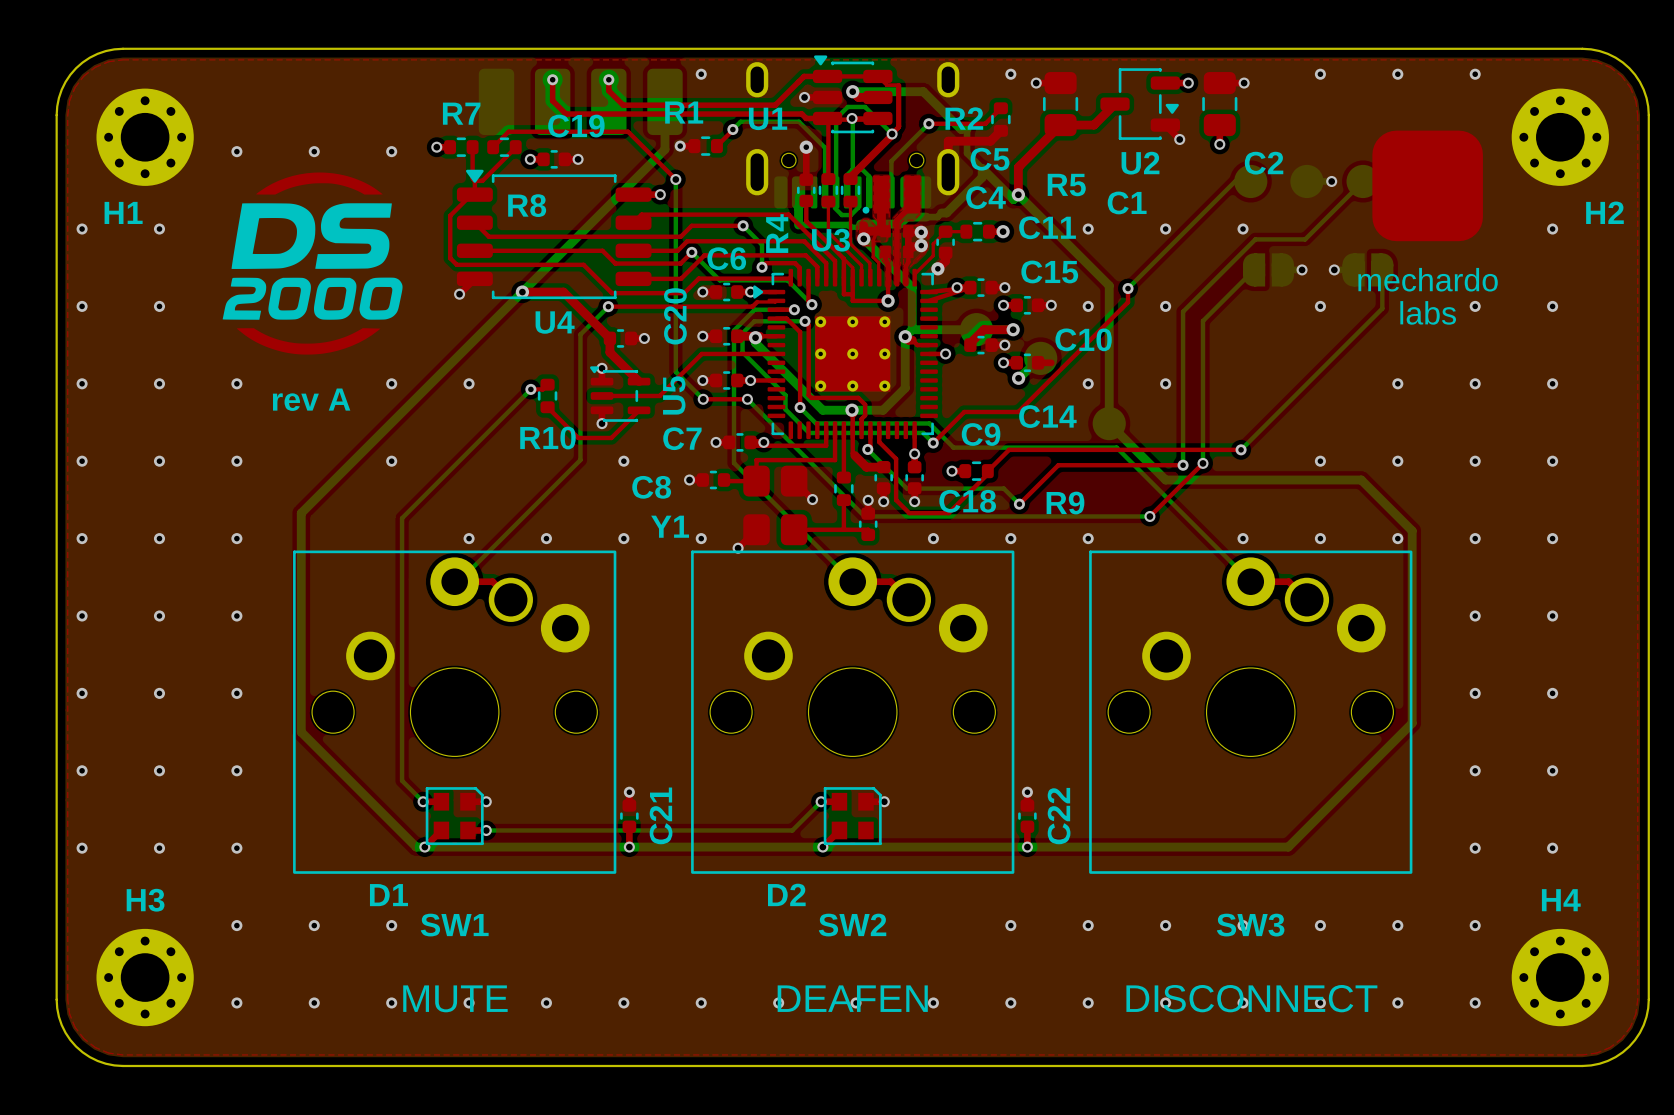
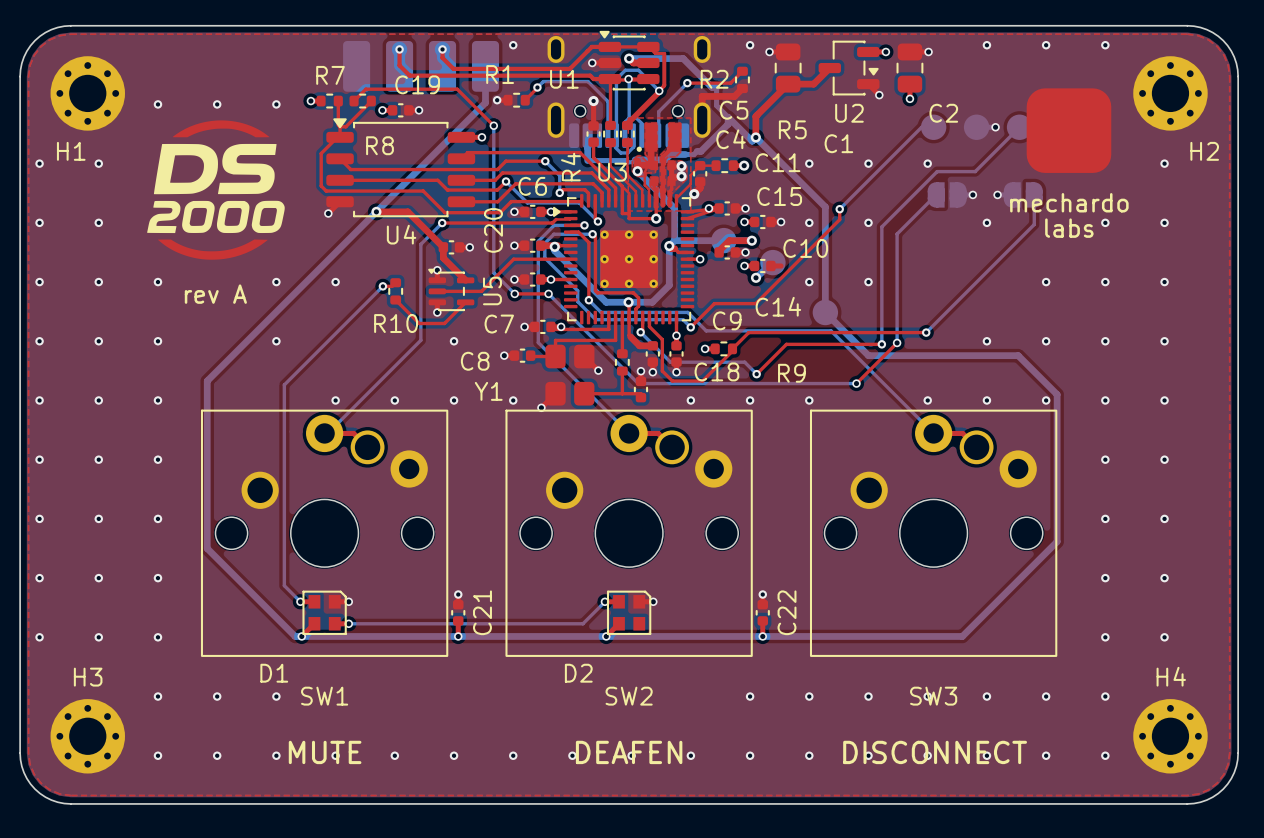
top zone outline: none -> (628, 117) (690, 117) (690, 211) (628, 211) (628, 117)

